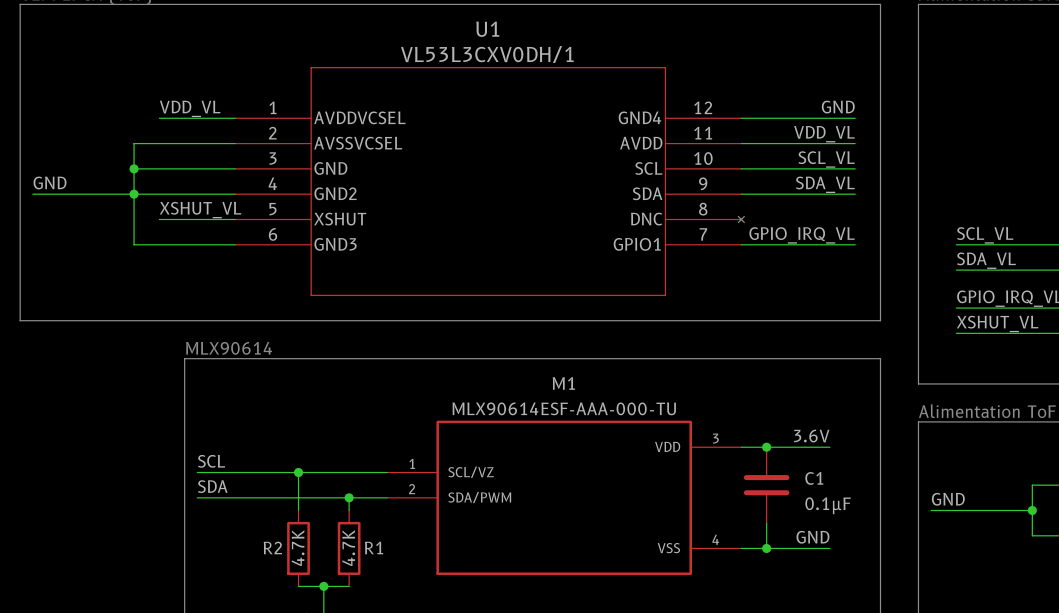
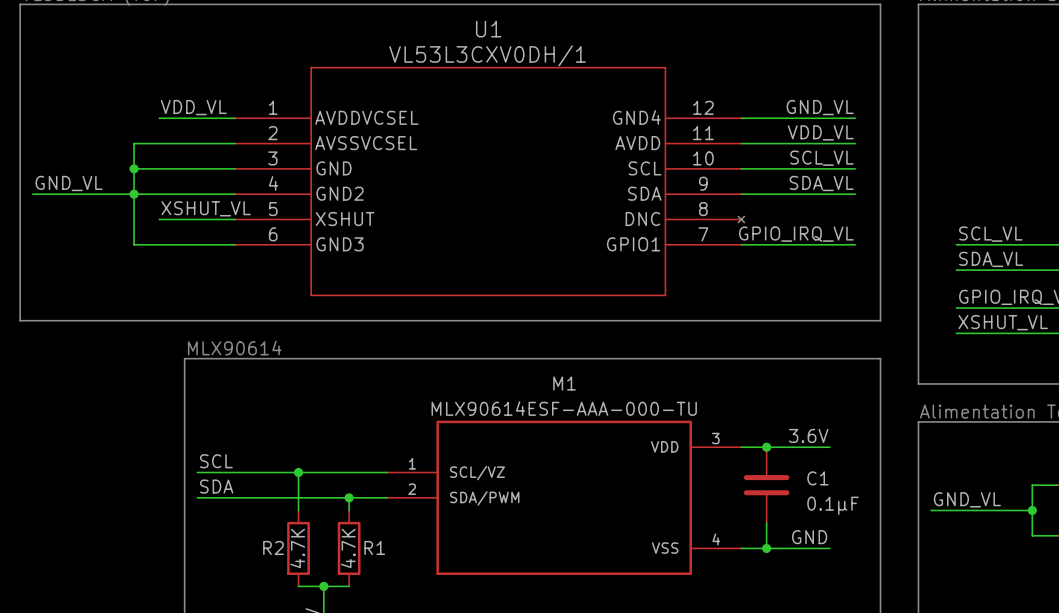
label: GND (838, 107) -> GND_VL (820, 107)
label: GND (50, 182) -> GND_VL (69, 183)
label: GND (948, 499) -> GND_VL (967, 499)

